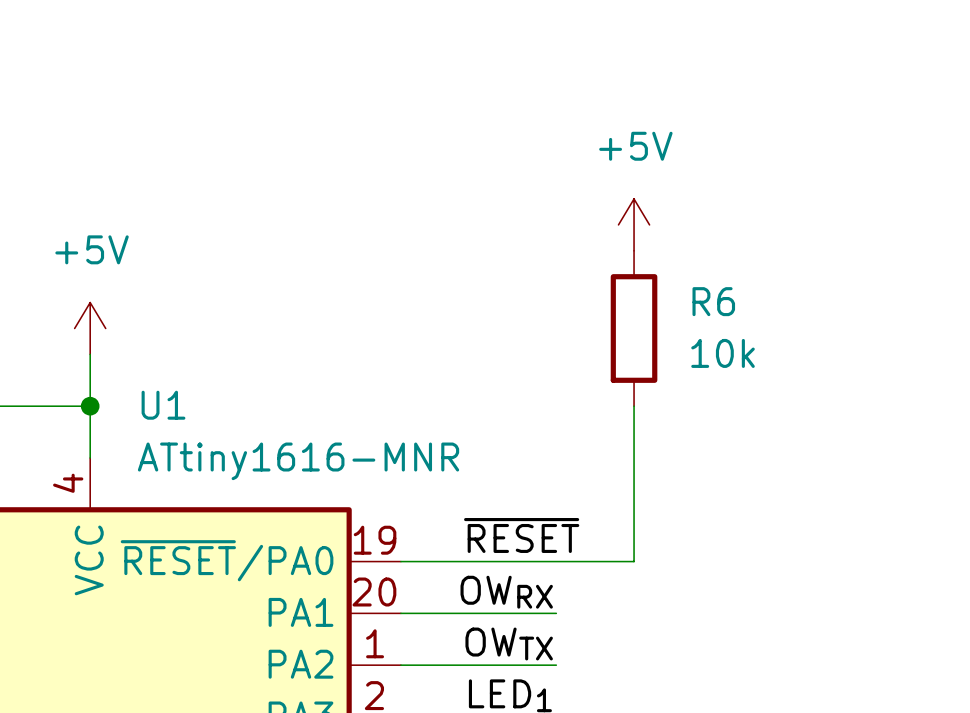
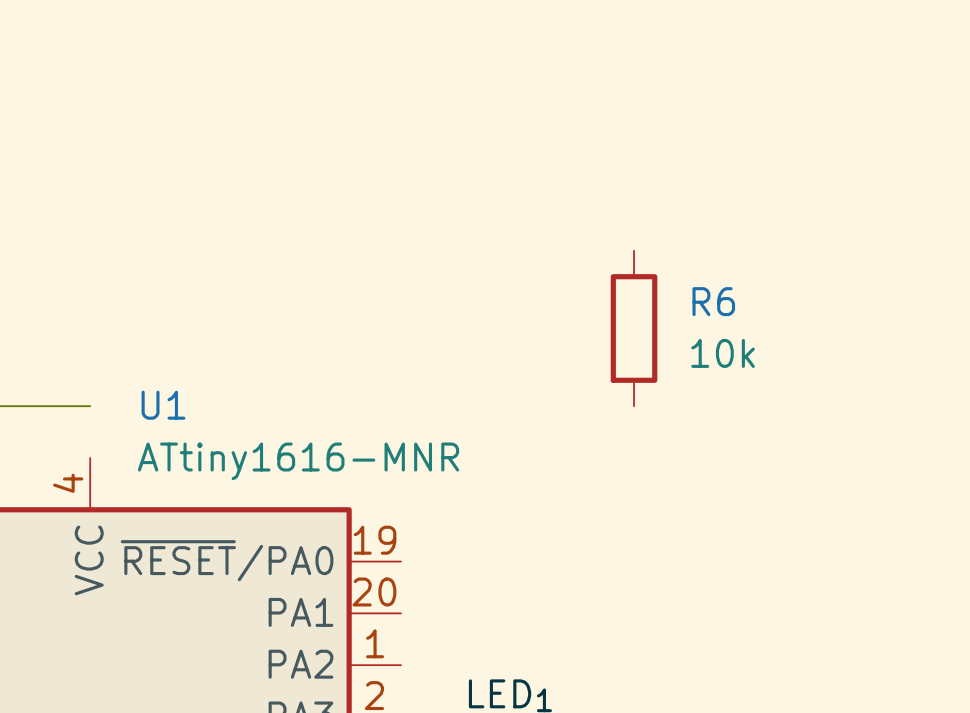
power symbol: +5V (634, 224) -> none
power symbol: +5V (90, 328) -> none
wire: (90, 354) (90, 457) -> none
junction: (90, 406) -> none
wire: (634, 406) (634, 561) (400, 561) -> none
label: ~{RESET} (521, 535) -> none
label: OWRX (506, 592) -> none
wire: (400, 613) (556, 613) -> none
label: OWTX (509, 644) -> none
wire: (400, 665) (556, 665) -> none

